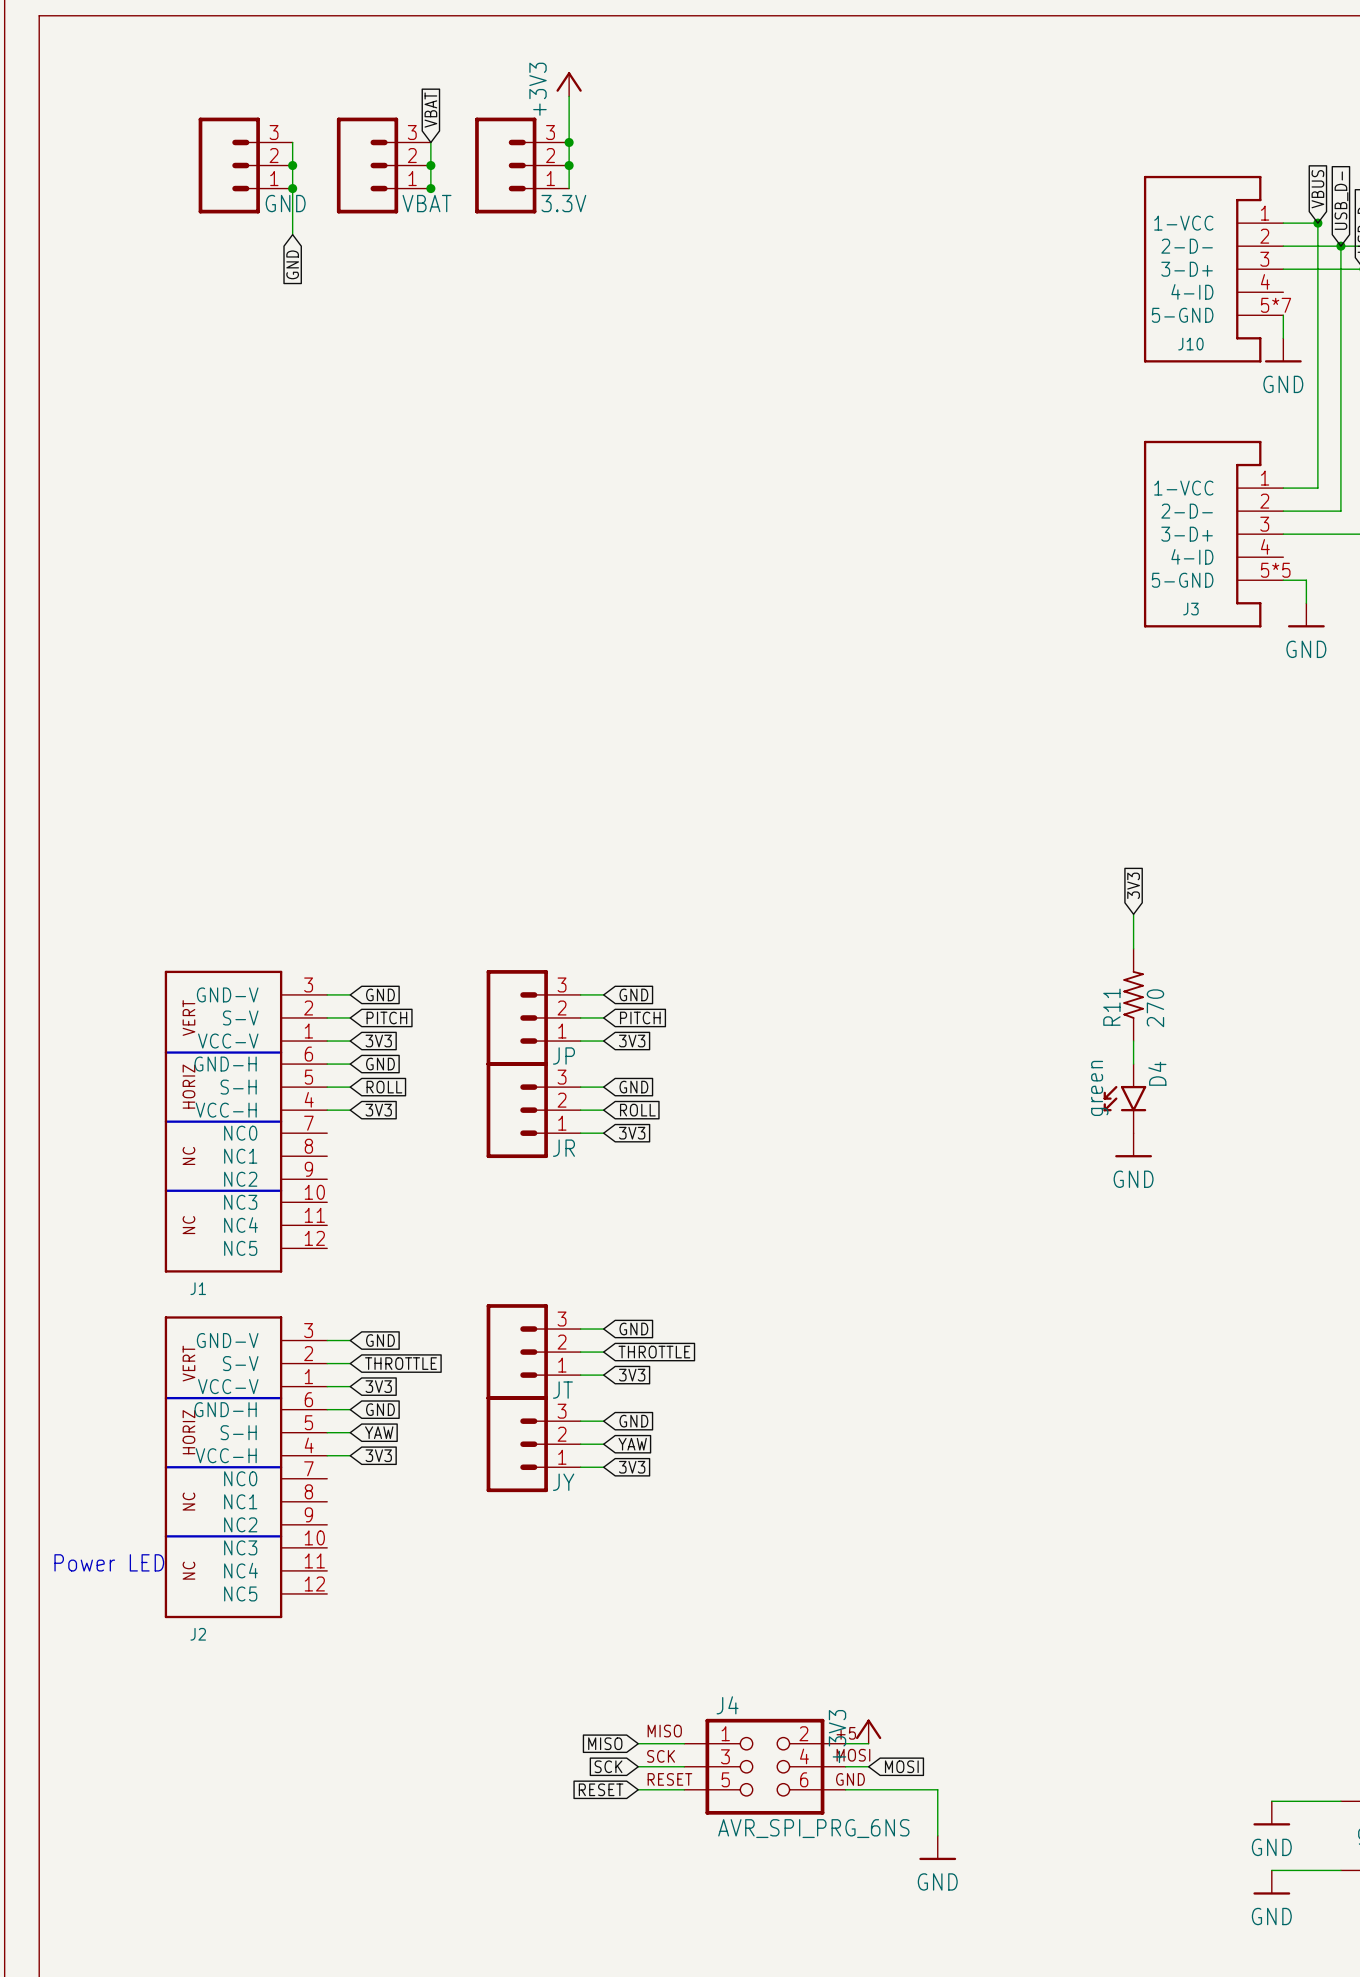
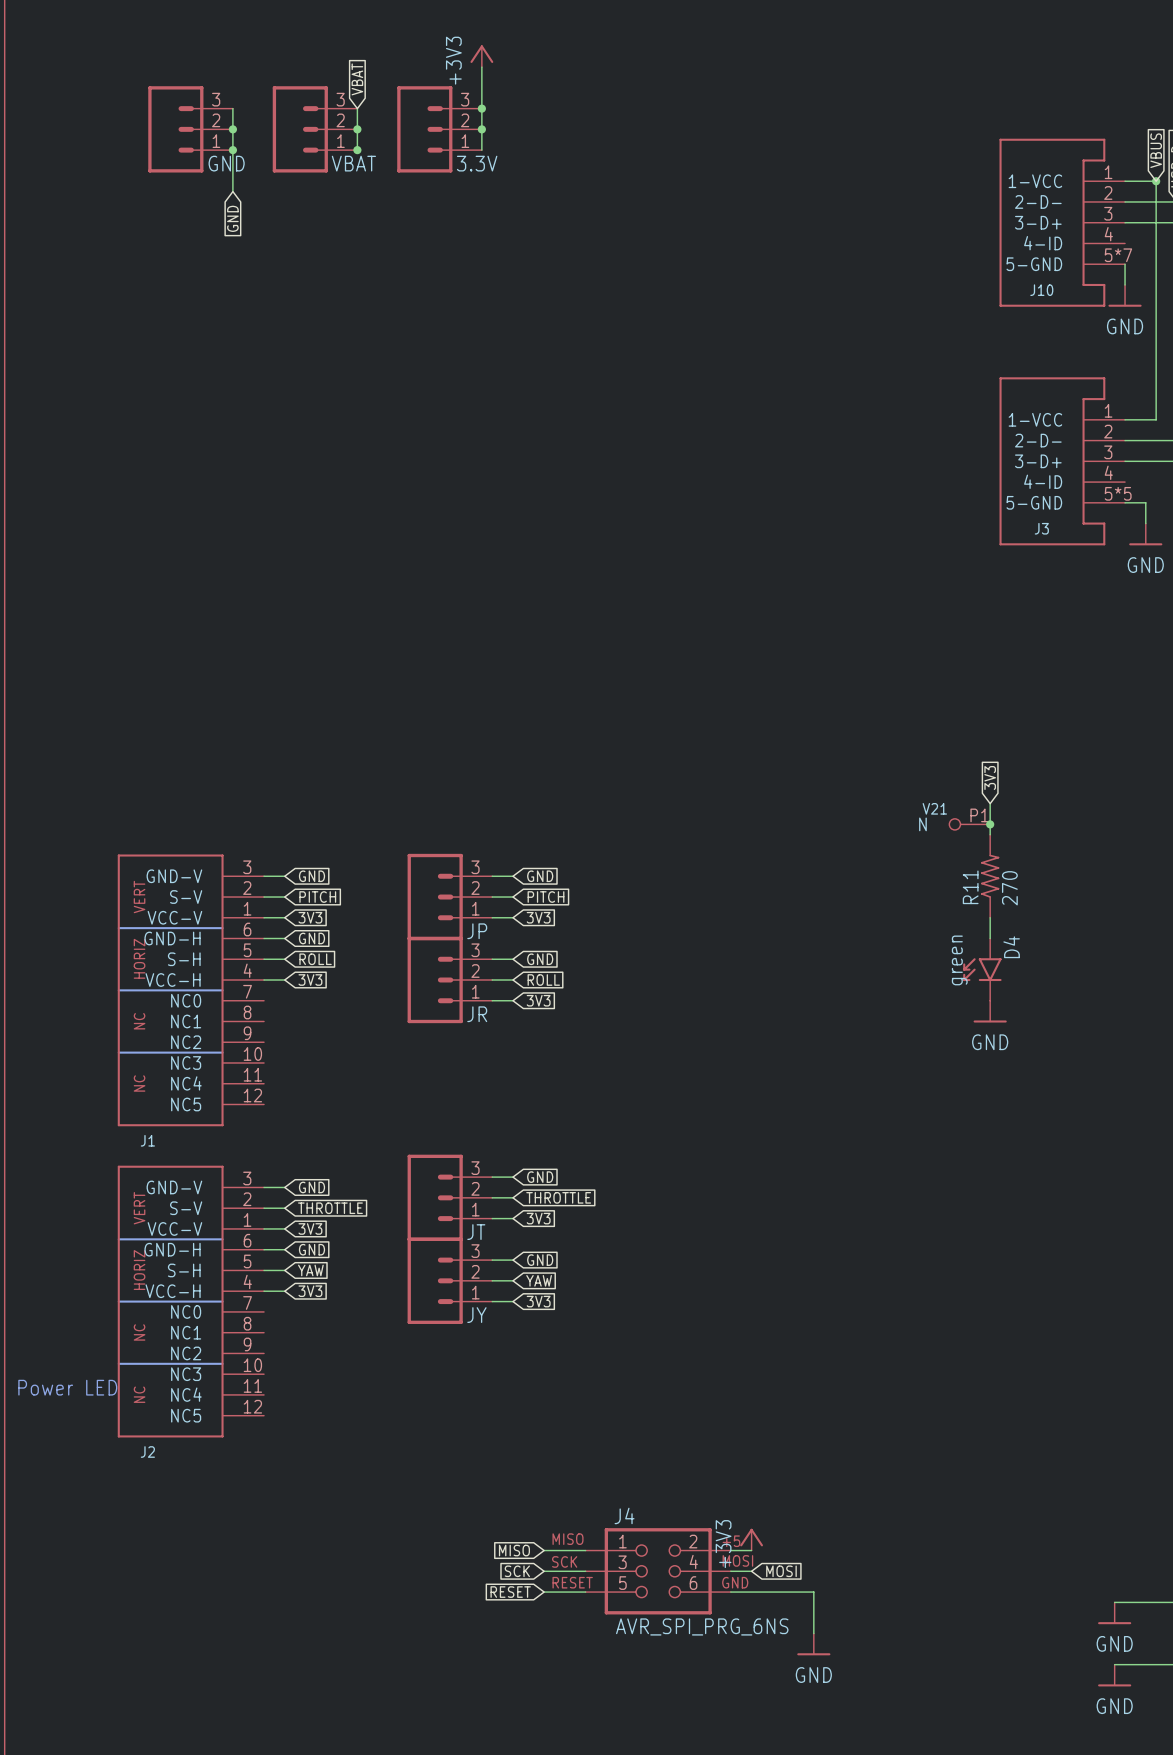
V21: none -> (969, 824)
junction: none -> (990, 824)

